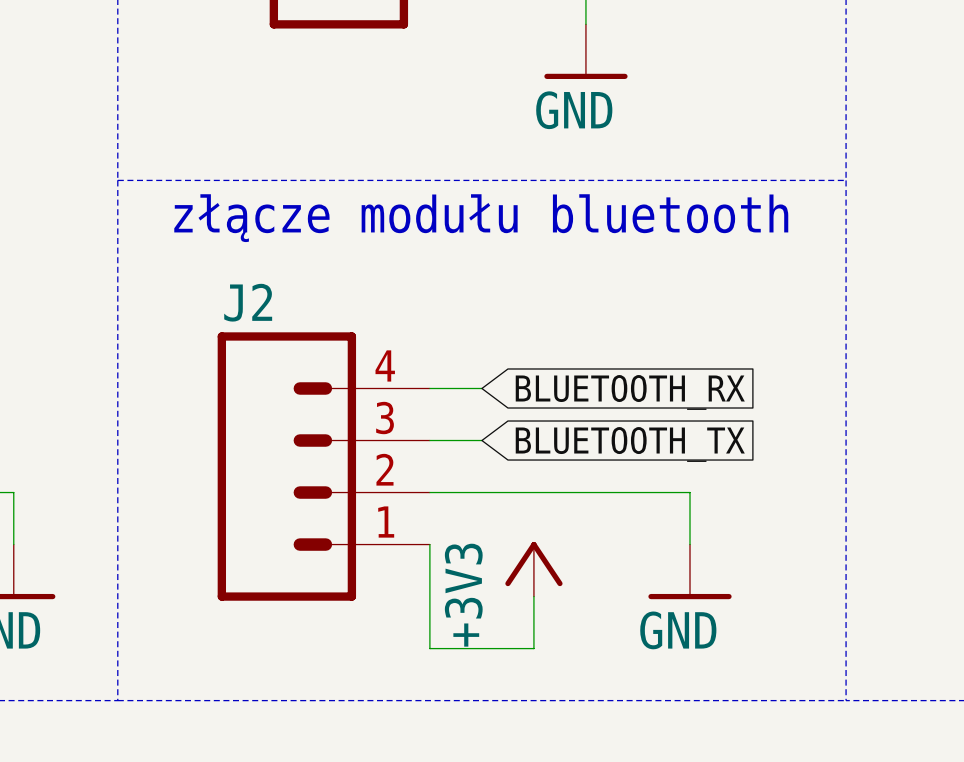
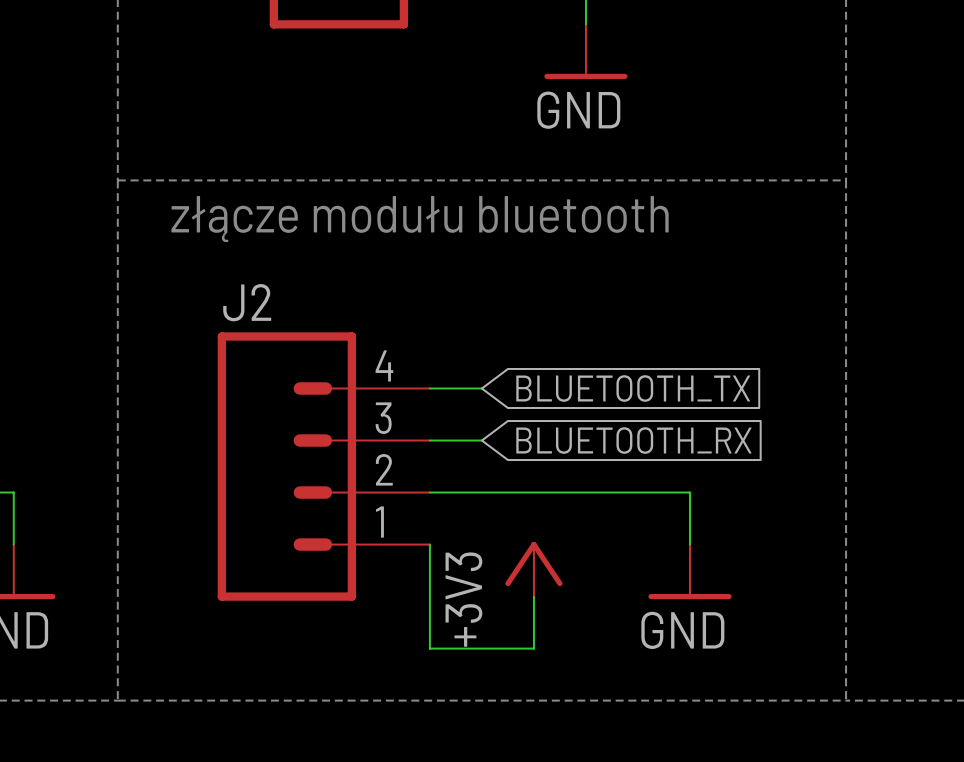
global label: BLUETOOTH_RX (630, 392) -> BLUETOOTH_TX (633, 388)
global label: BLUETOOTH_TX (630, 444) -> BLUETOOTH_RX (633, 440)

